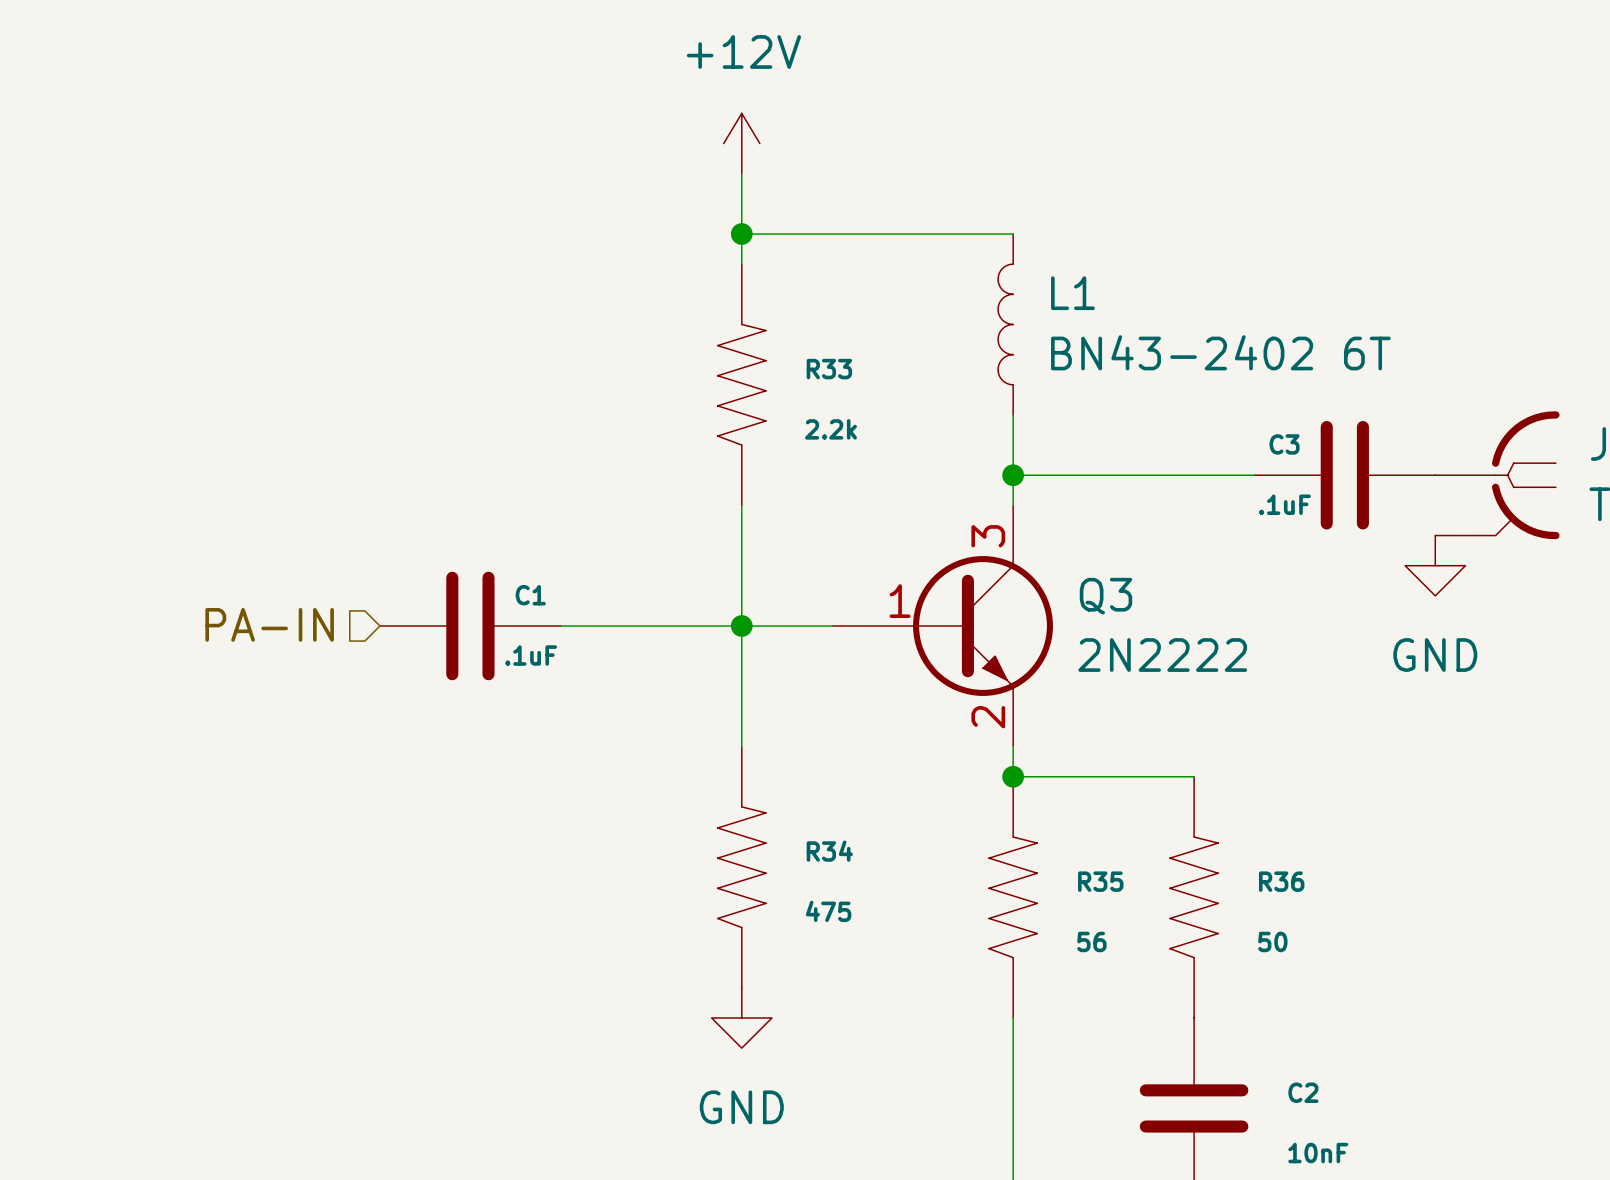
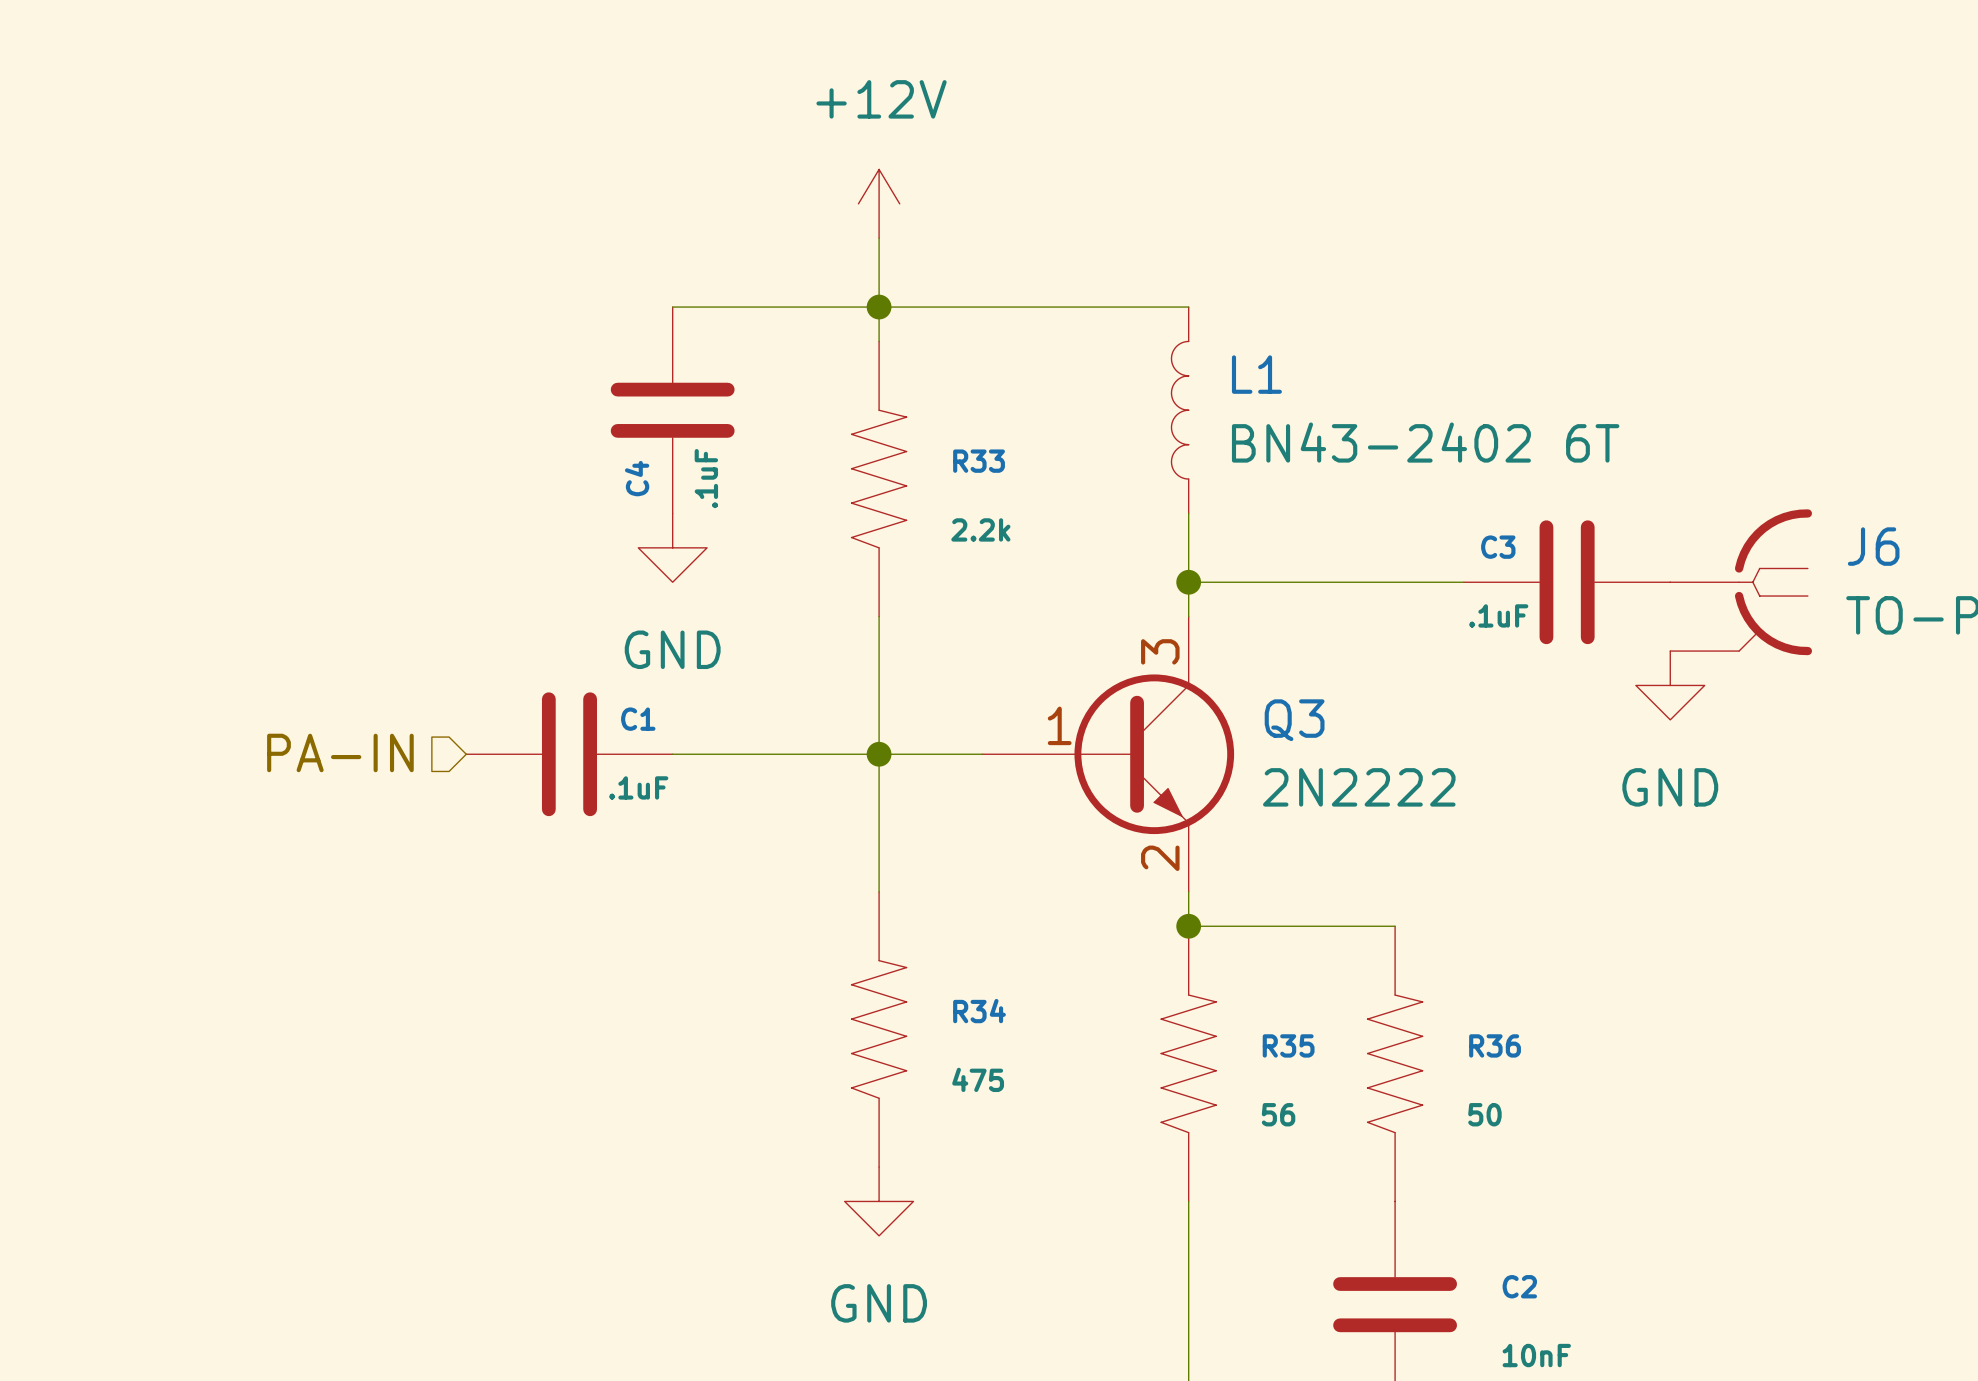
wire: none -> (672, 307) (879, 307)
C4: none -> .1uF (672, 410)
power symbol: none -> GND (672, 547)

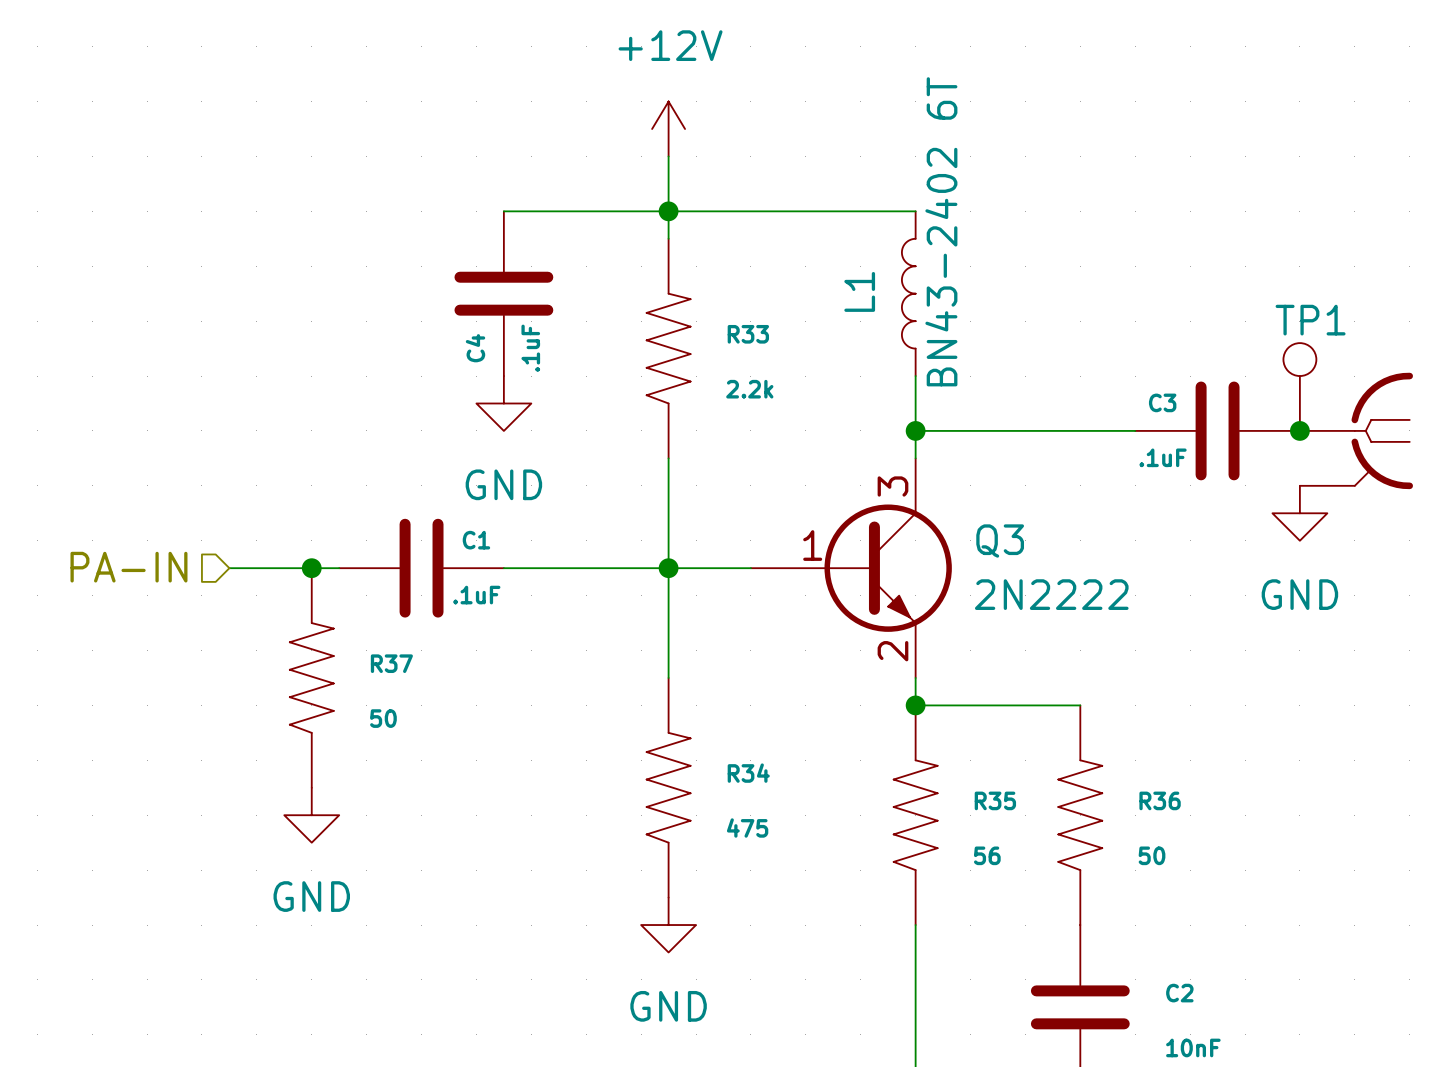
L1 name rotation: 0° (1256, 374) -> 90° counterclockwise (859, 291)
L1 name position: L1 (1256, 374) -> L1 (859, 291)
L1 value rotation: 0° (1425, 442) -> 90° counterclockwise (941, 231)
TP1: none -> (1299, 387)
junction: none -> (1299, 430)
hierarchical label position: PA-IN (340, 752) -> PA-IN (128, 567)
wire: none -> (229, 568) (339, 568)
junction: none -> (311, 568)
R37: none -> 50 (311, 677)
power symbol: none -> GND (311, 815)

